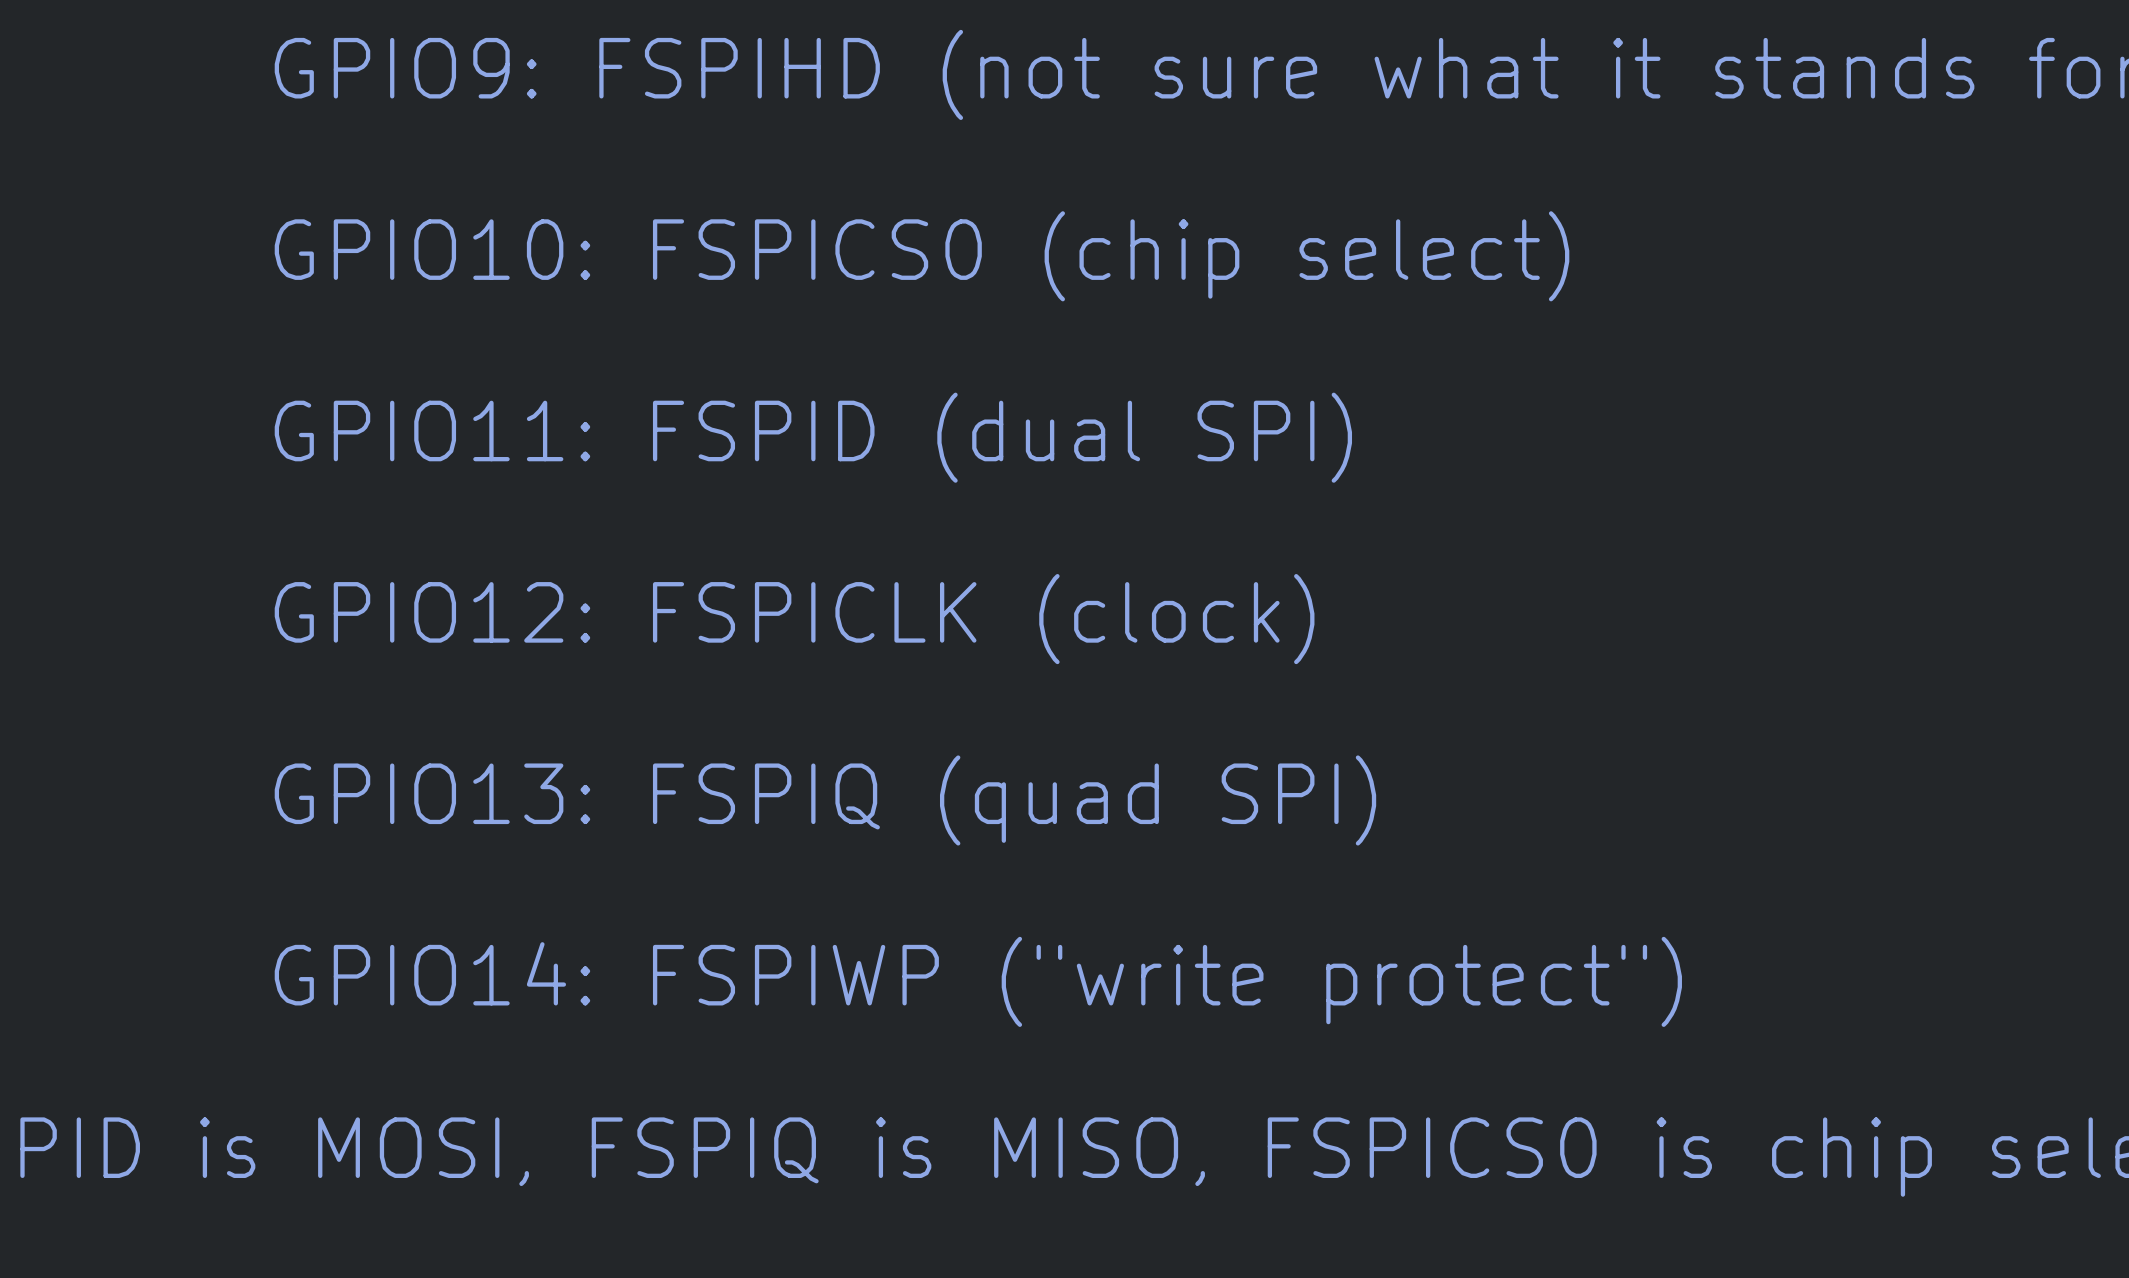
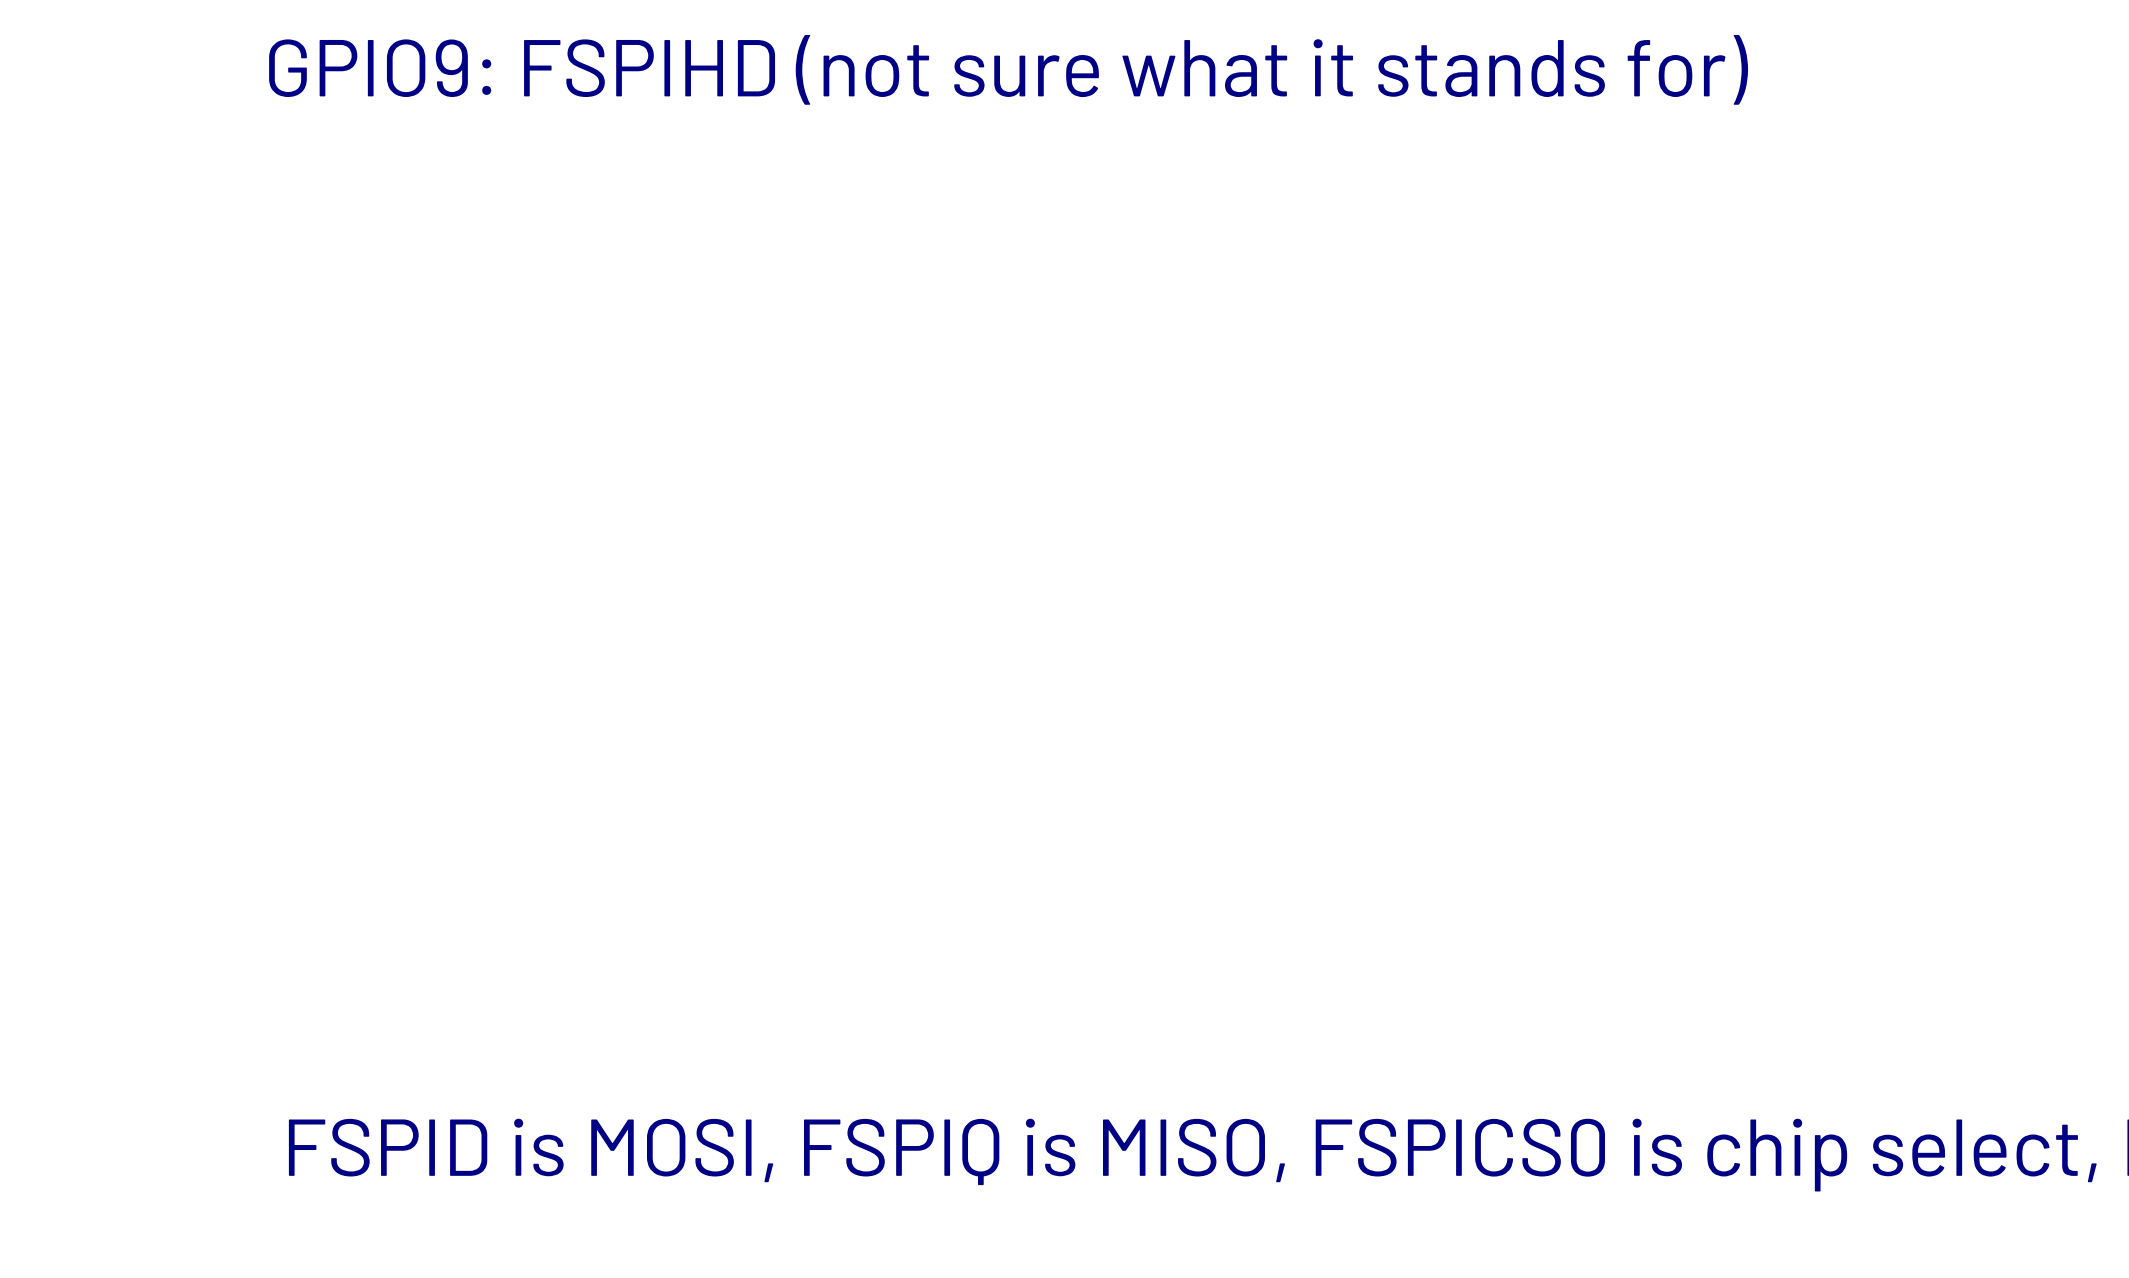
text: GPIO10: FSPICS0 (chip select) (922, 256) -> none
text: GPIO11: FSPID (dual SPI) (813, 437) -> none
text: GPIO12: FSPICLK (clock) (794, 619) -> none
text: GPIO13: FSPIQ (quad SPI) (825, 800) -> none
text: GPIO14: FSPIWP ("write protect") (978, 981) -> none

